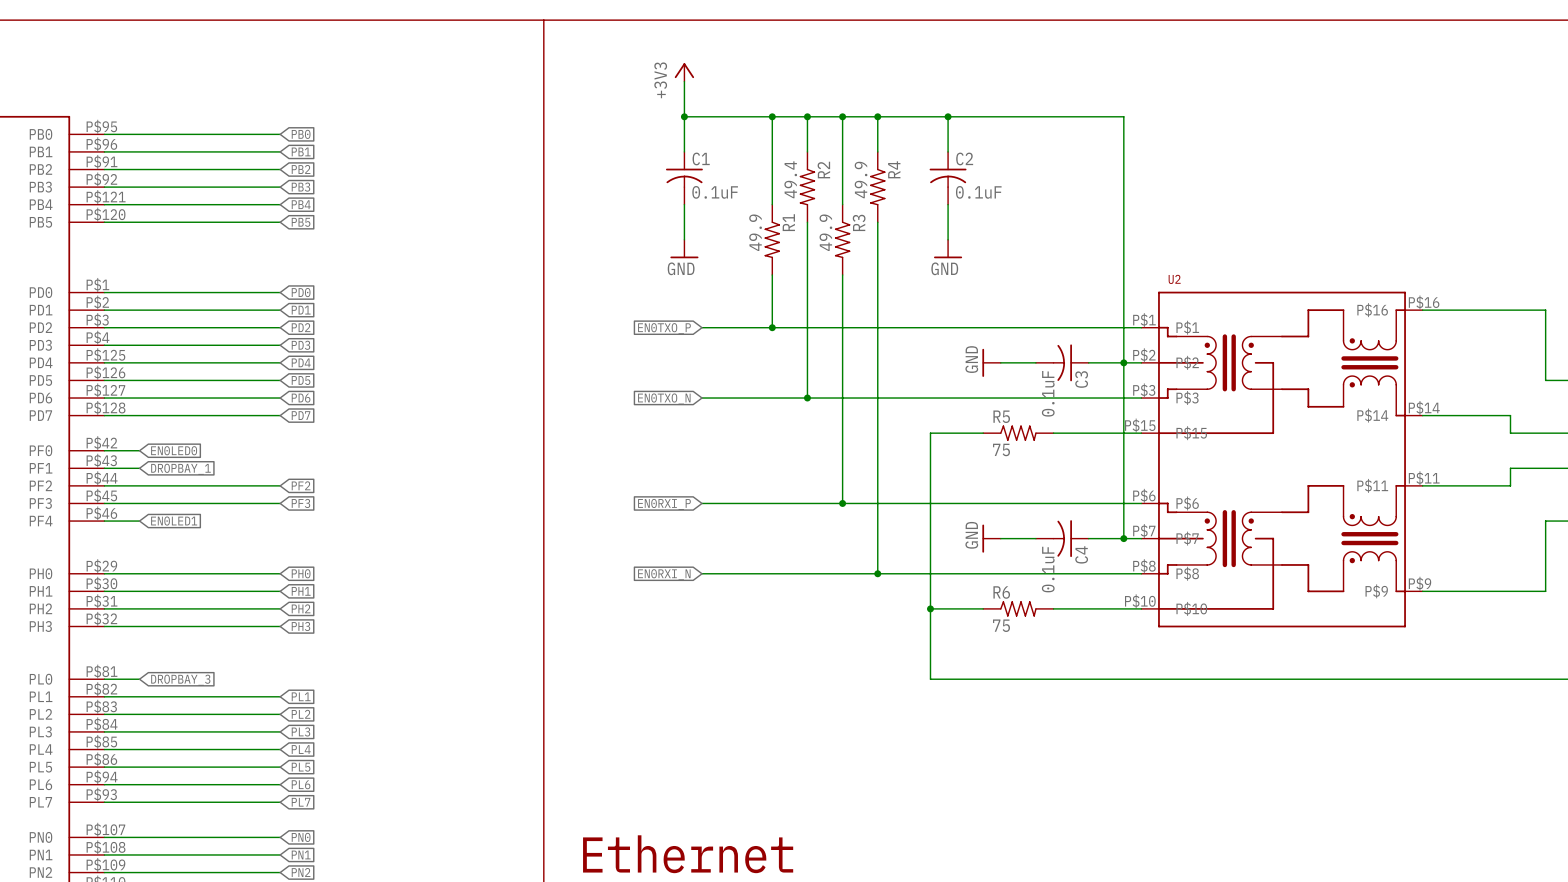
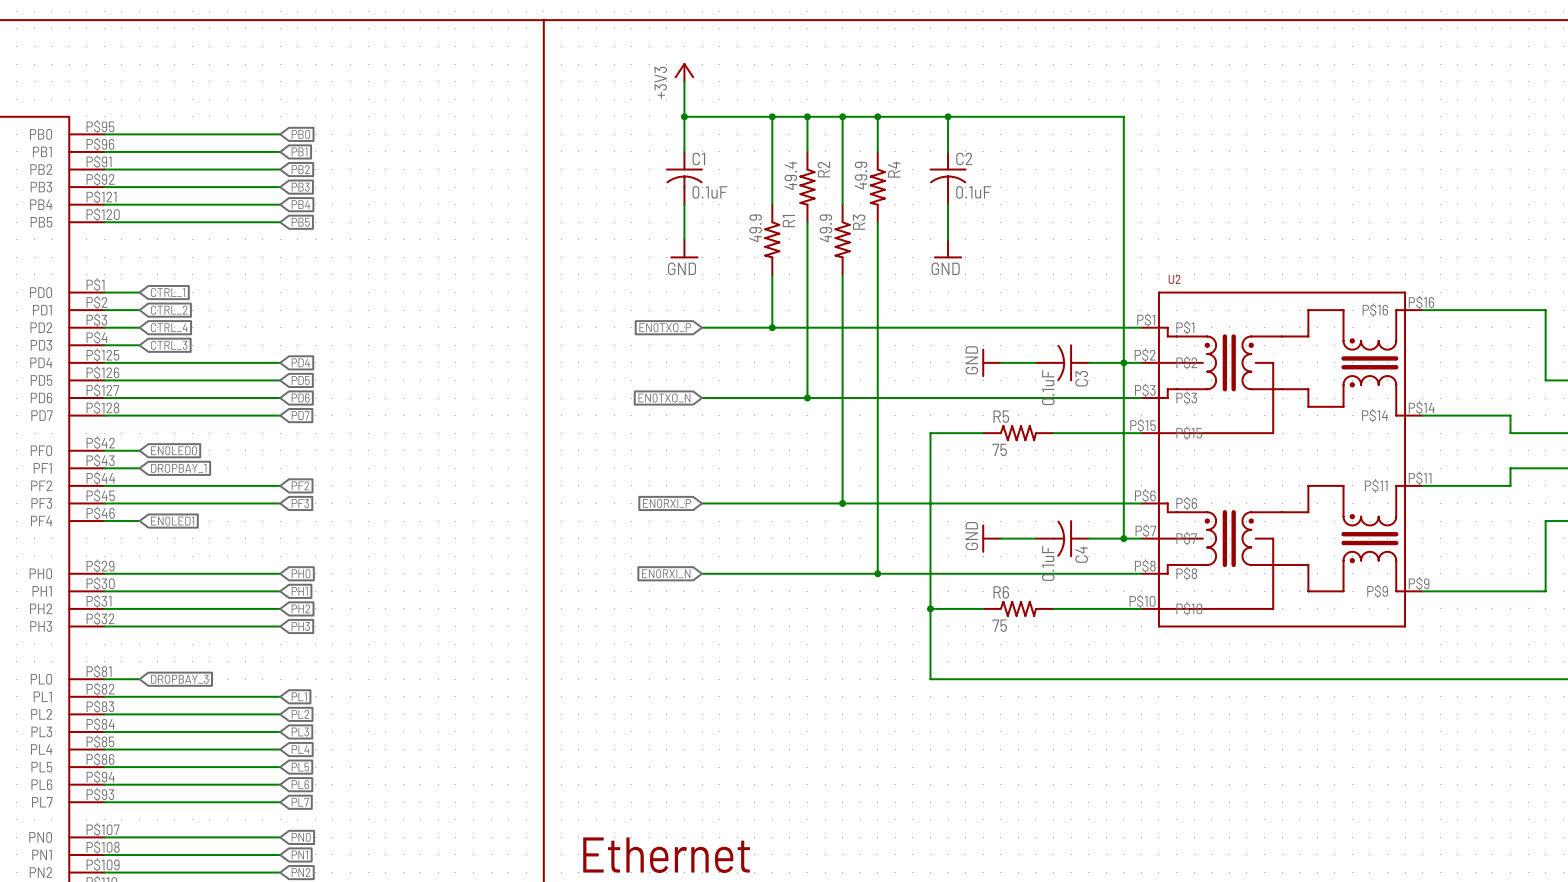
wire: (139, 292) (280, 292) -> none
global label: PD0 (301, 292) -> none
global label: none -> CTRL_1 (168, 292)
wire: (139, 310) (280, 310) -> none
global label: PD1 (301, 310) -> none
global label: none -> CTRL_2 (169, 310)
wire: (139, 327) (280, 327) -> none
global label: PD2 (301, 327) -> none
global label: none -> CTRL_4 (169, 327)
wire: (139, 345) (280, 345) -> none
global label: PD3 (300, 345) -> none
global label: none -> CTRL_3 (169, 345)

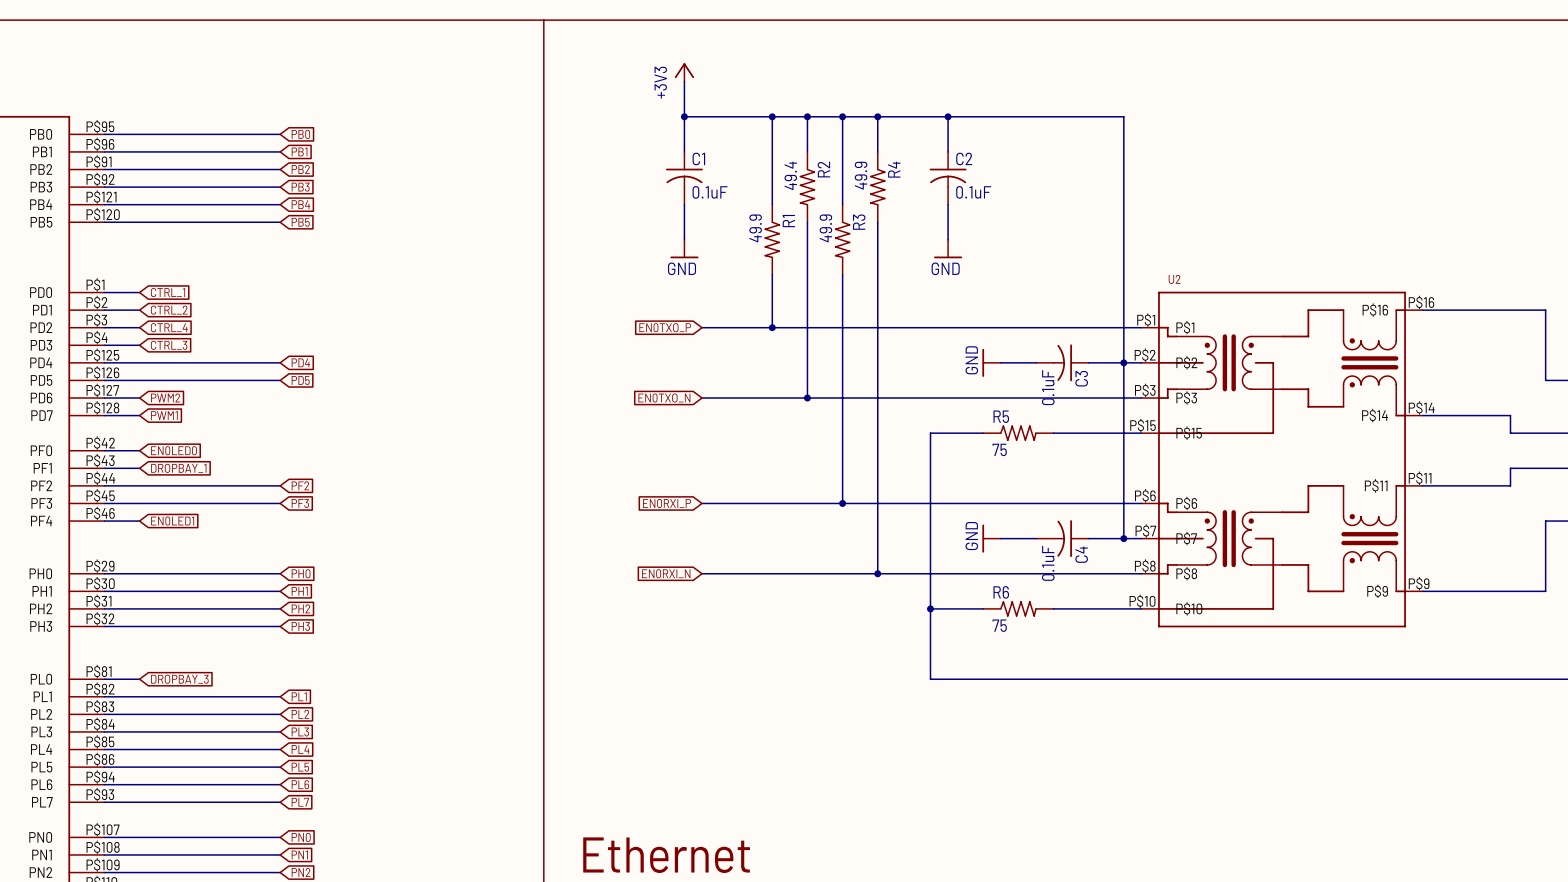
global label: none -> PWM2 (165, 397)
wire: (139, 398) (280, 398) -> none
global label: PD6 (300, 398) -> none
wire: (139, 415) (280, 415) -> none
global label: none -> PWM1 (164, 415)
global label: PD7 (300, 415) -> none

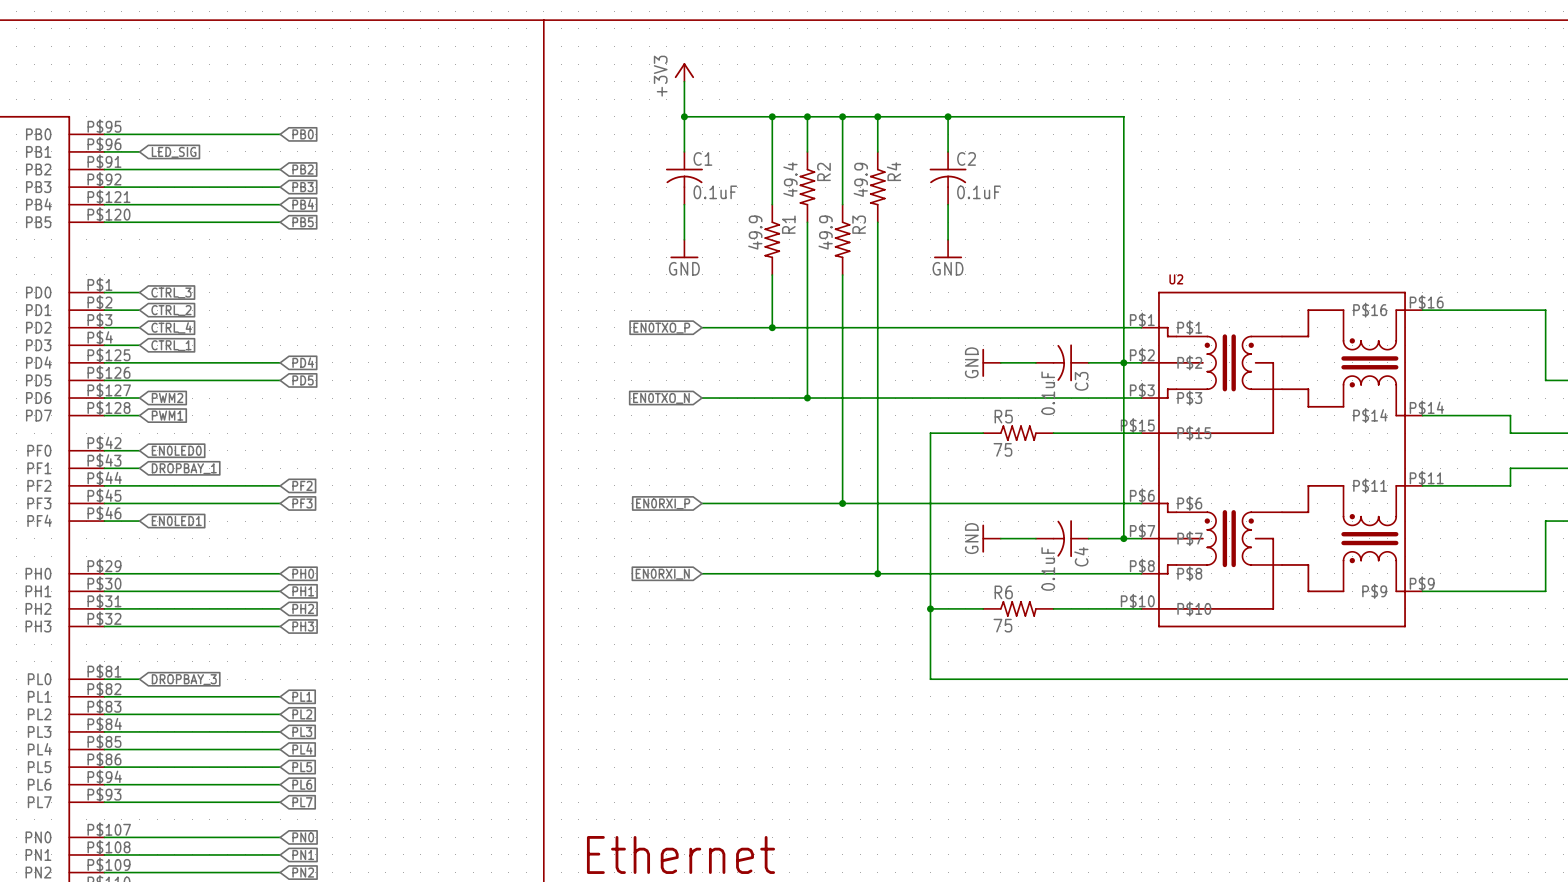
wire: (139, 151) (280, 151) -> none
global label: none -> LED_SIG (174, 152)
global label: PB1 (299, 151) -> none
global label: CTRL_1 (168, 292) -> CTRL_3 (171, 292)
global label: CTRL_3 (169, 345) -> CTRL_1 (171, 345)

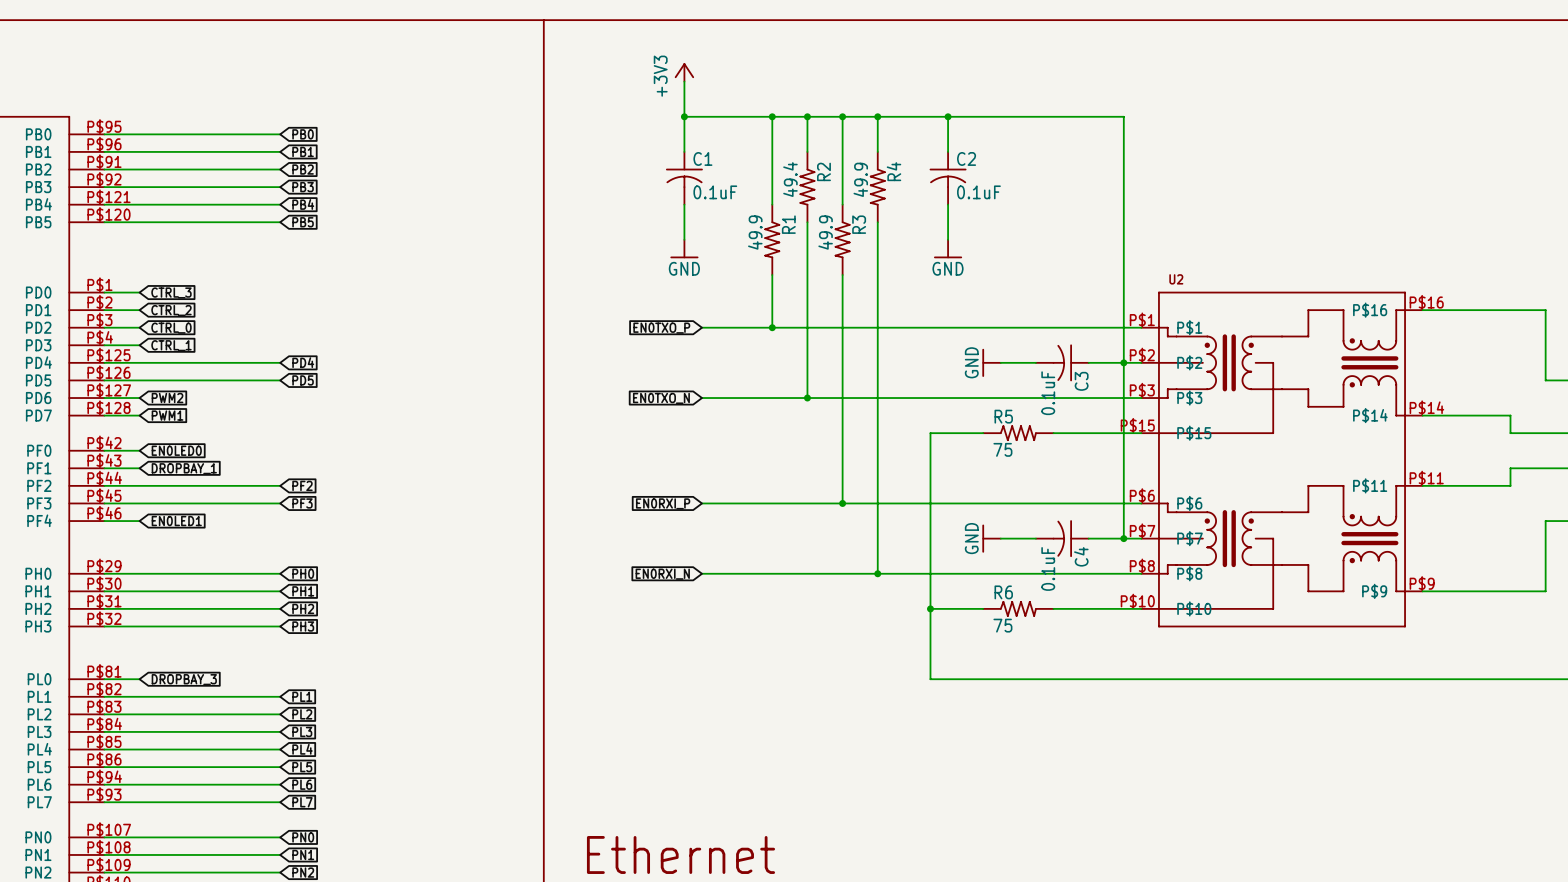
wire: none -> (139, 151) (280, 151)
global label: none -> PB1 (303, 151)
global label: LED_SIG (174, 152) -> none
global label: CTRL_4 (171, 327) -> CTRL_0 (171, 328)

